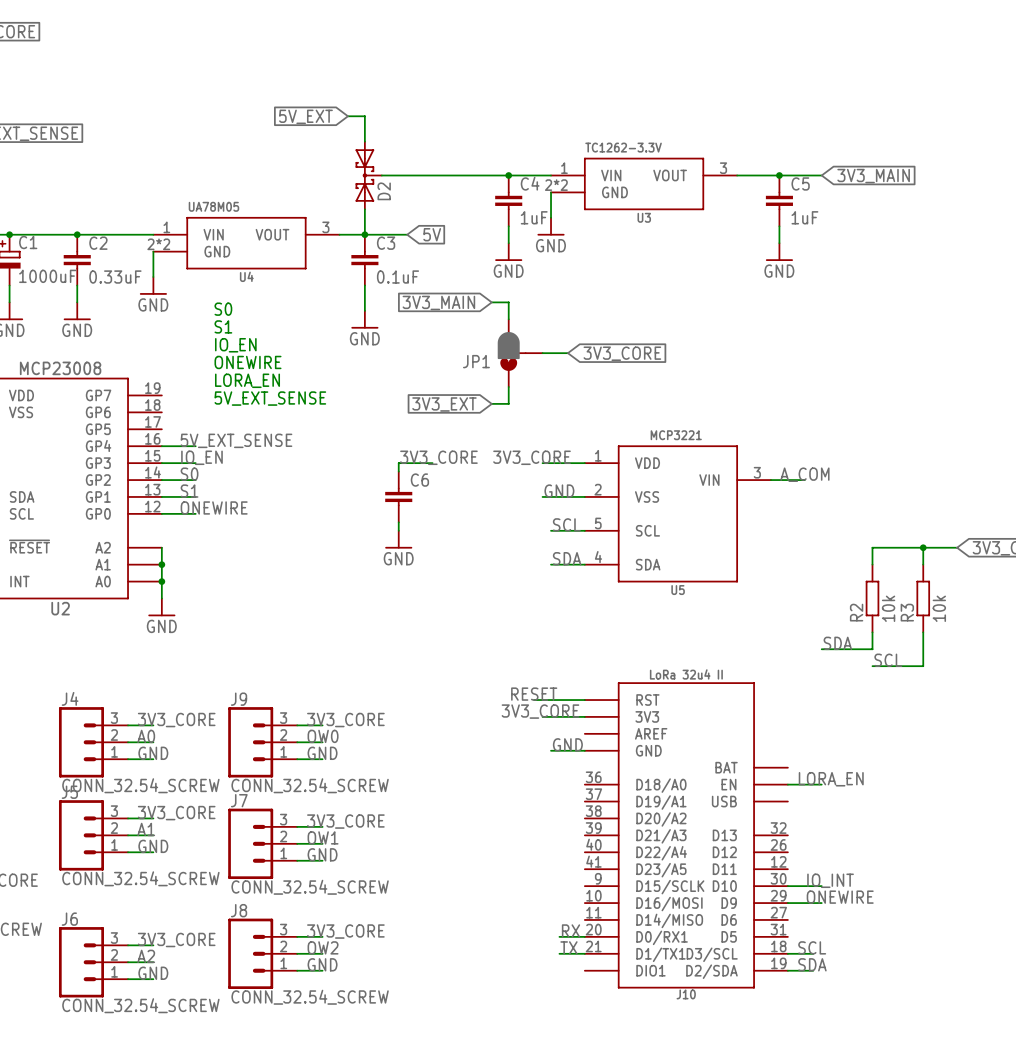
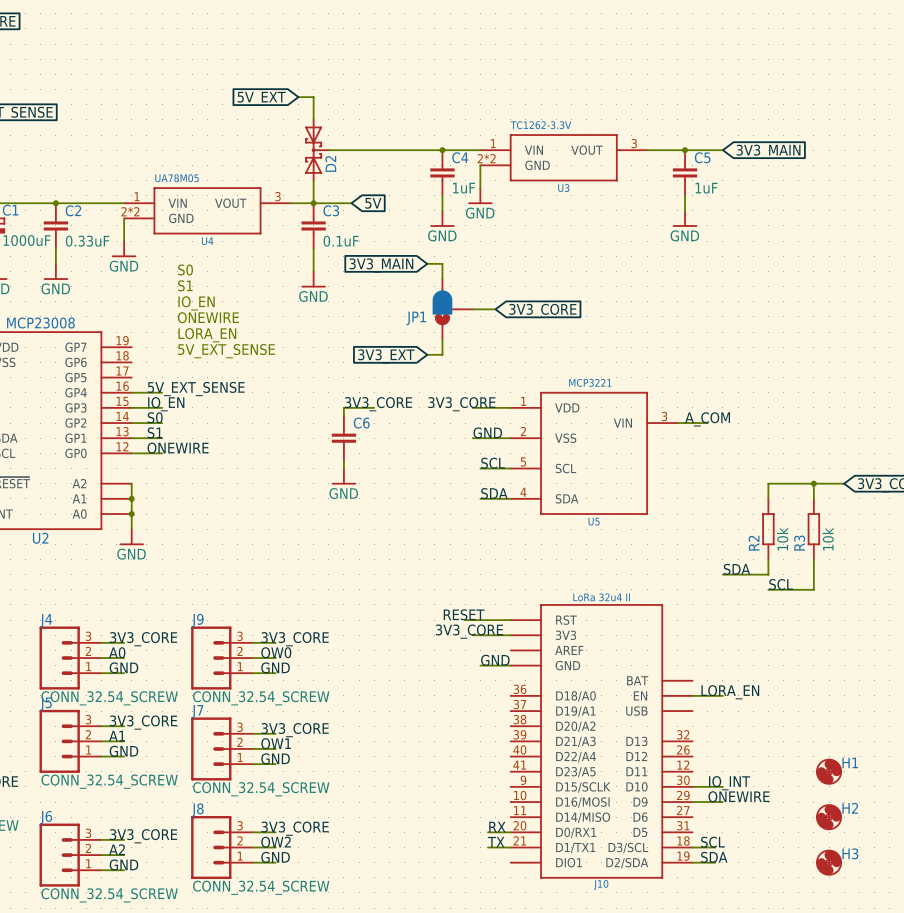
H1: none -> (829, 771)
H2: none -> (829, 817)
H3: none -> (829, 862)

